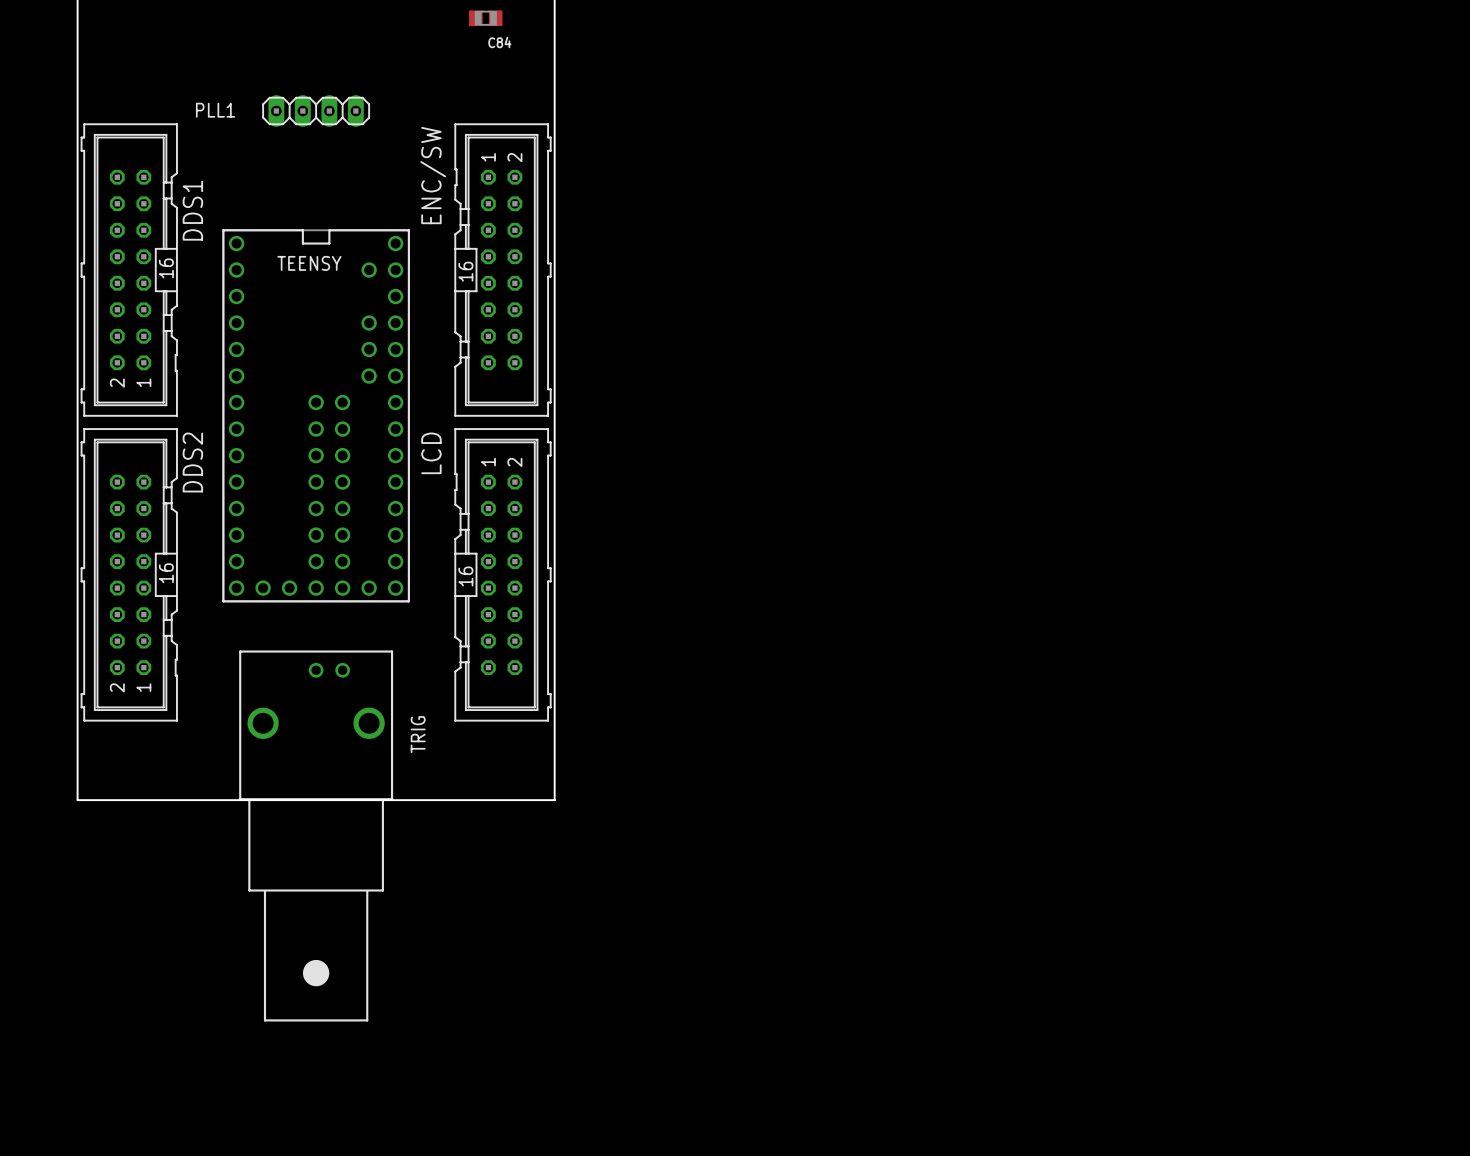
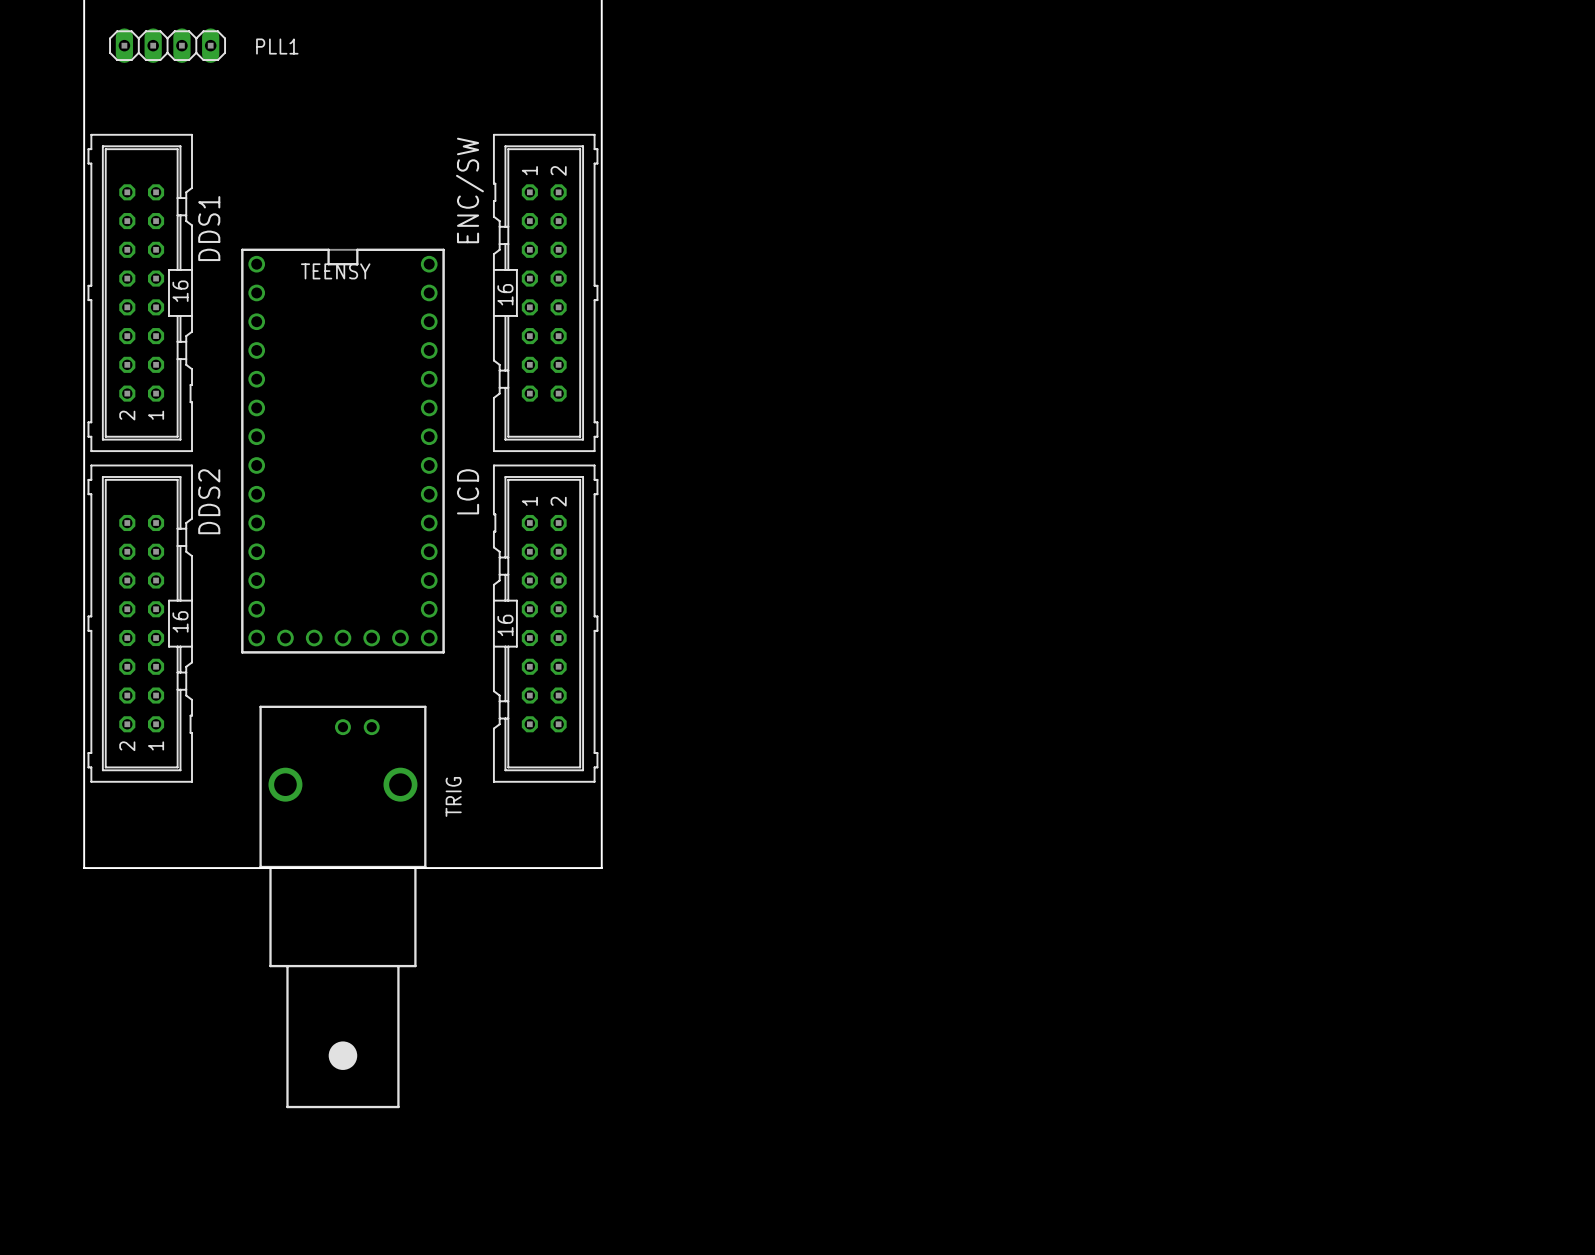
C84: (485, 18) -> none
PLL1 name position: PLL1 (215, 110) -> PLL1 (277, 46)
PLL1 position: (316, 111) -> (167, 45)
TEENSY footprint: [222, 229, 410, 603] -> [241, 248, 445, 654]

